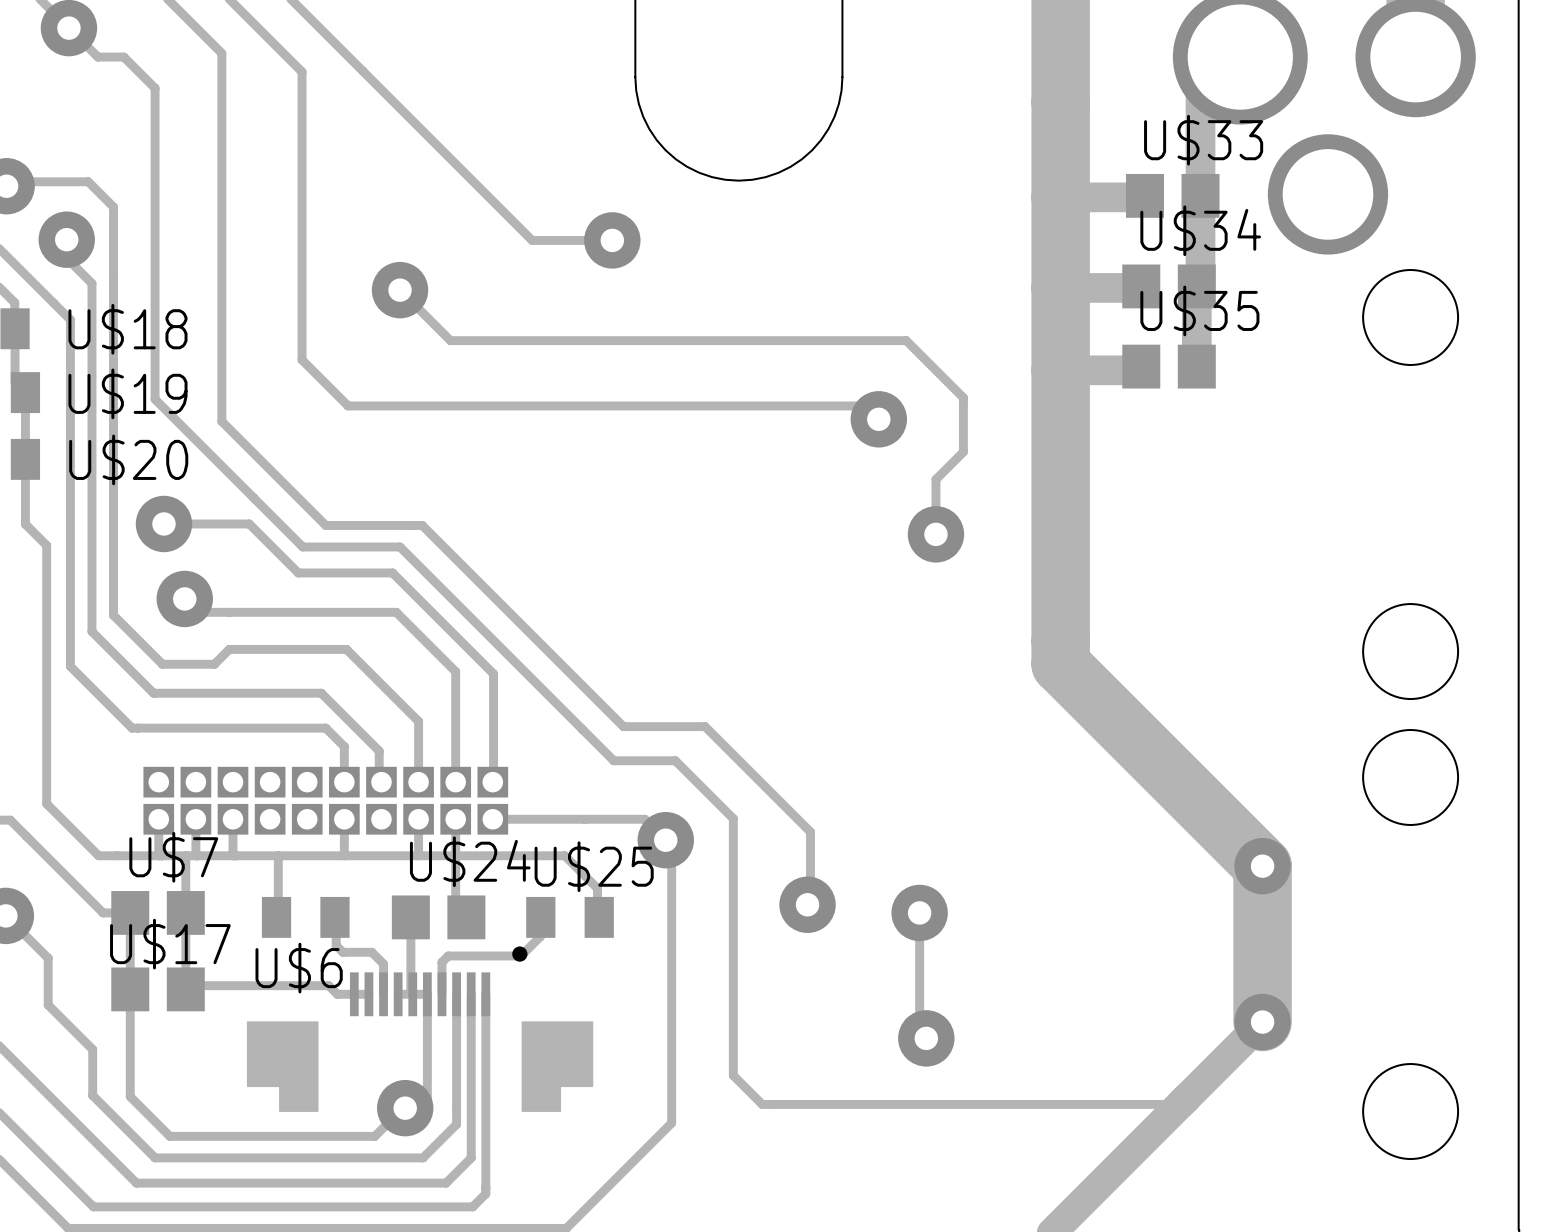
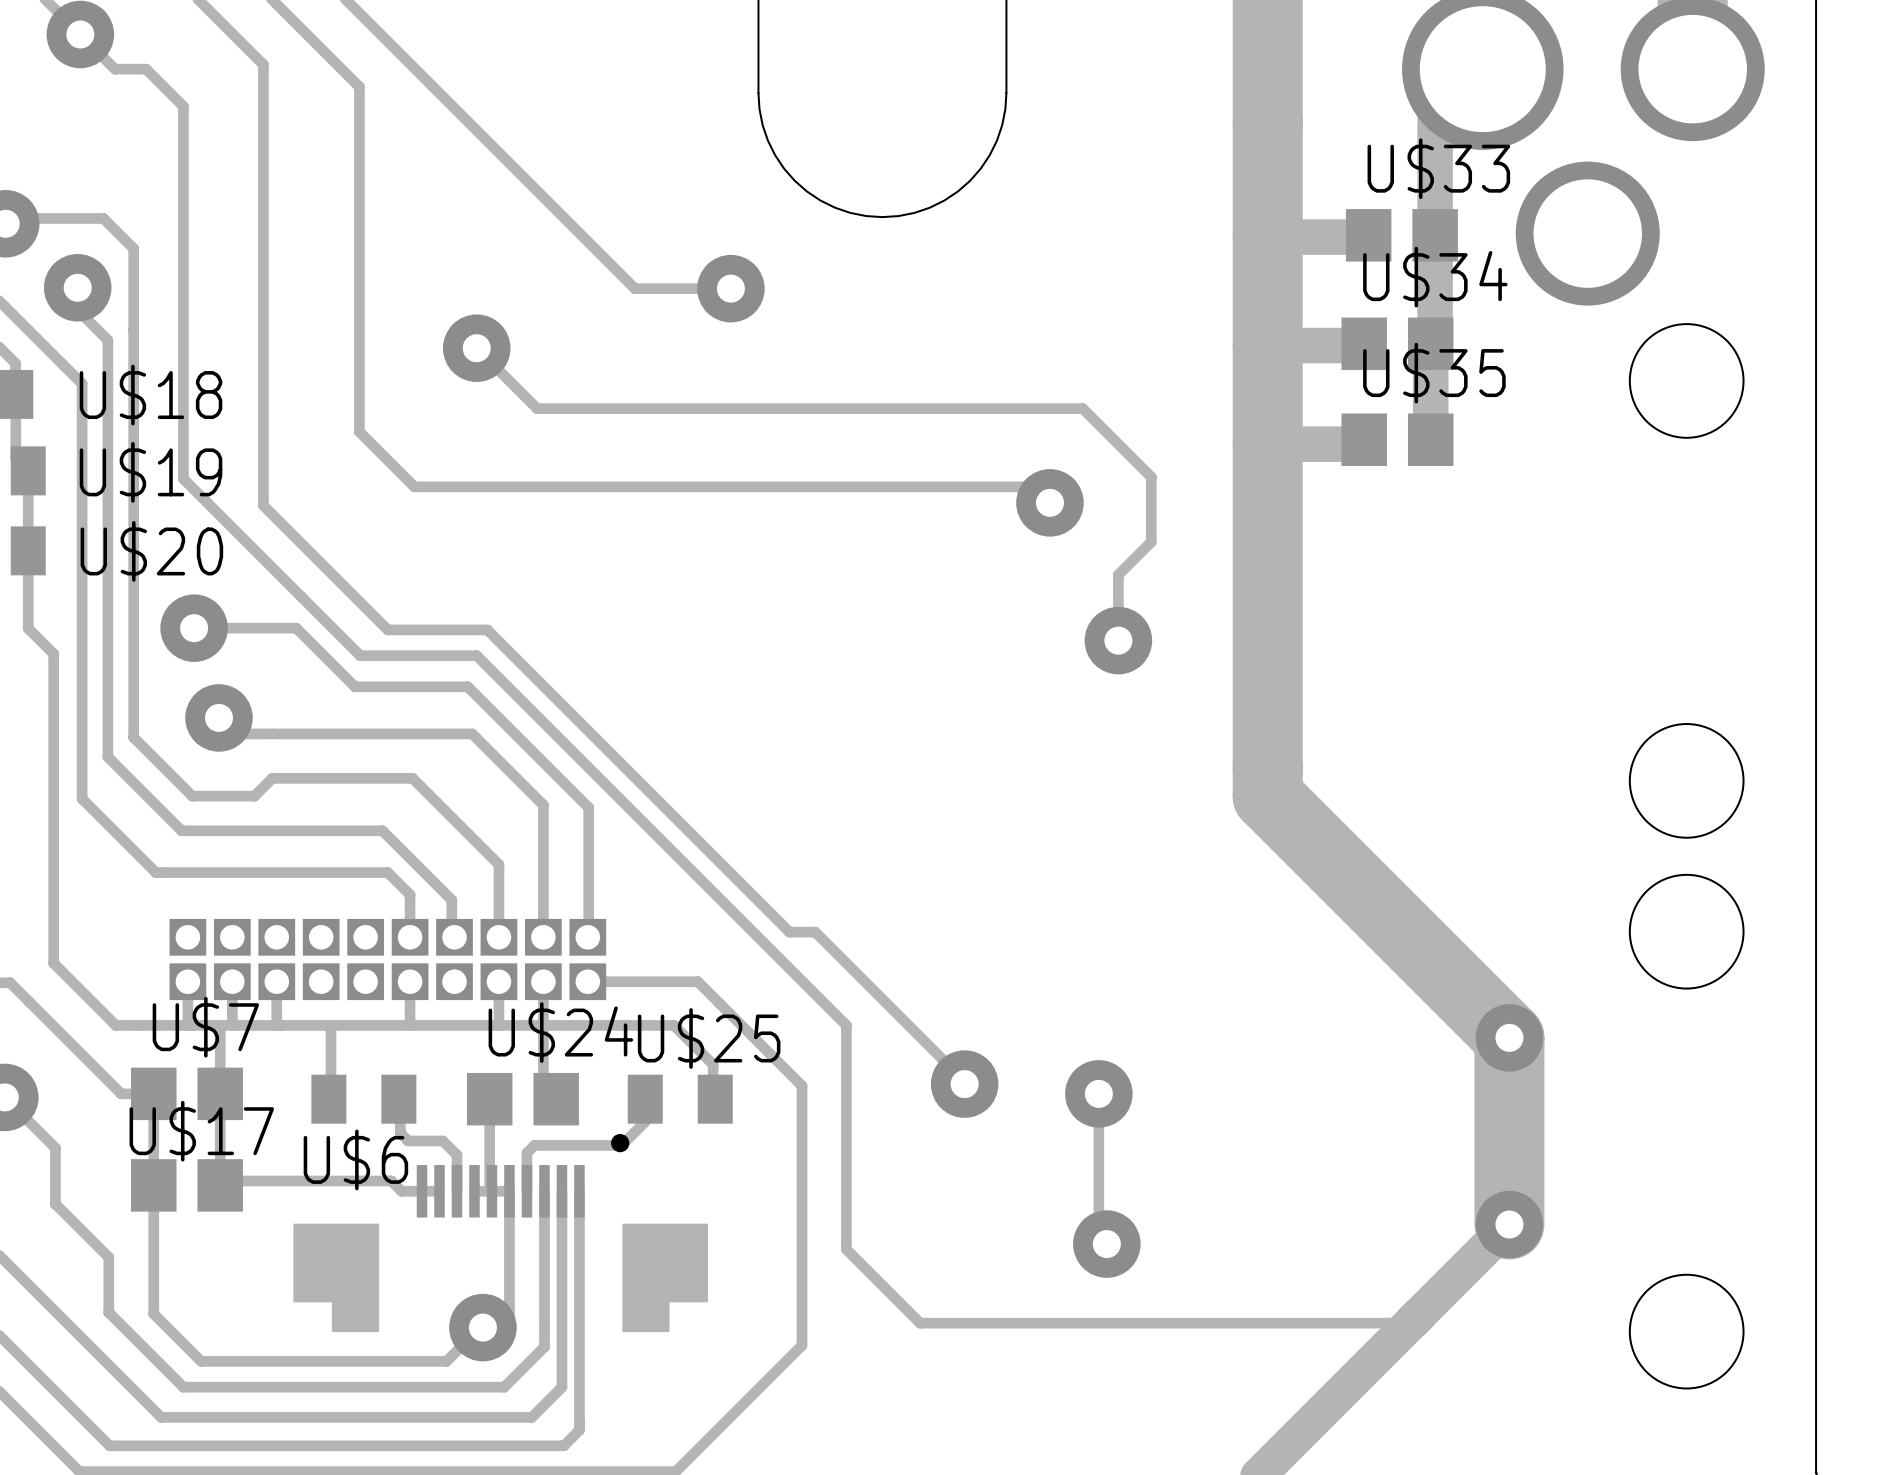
track: (408, 525) (422, 525) (623, 726) (705, 726) (810, 832) (810, 901) (807, 904) -> (487, 629) (789, 932) (815, 932) (964, 1081) (964, 1084)
track: (613, 760) (675, 760) (733, 818) (733, 1075) (762, 1104) (770, 1104) -> (732, 911) (846, 1025) (846, 1249) (920, 1323)
track: (584, 819) (644, 819) (671, 846) (671, 906) -> (697, 981) (802, 1085)
via: (665, 840) -> none

